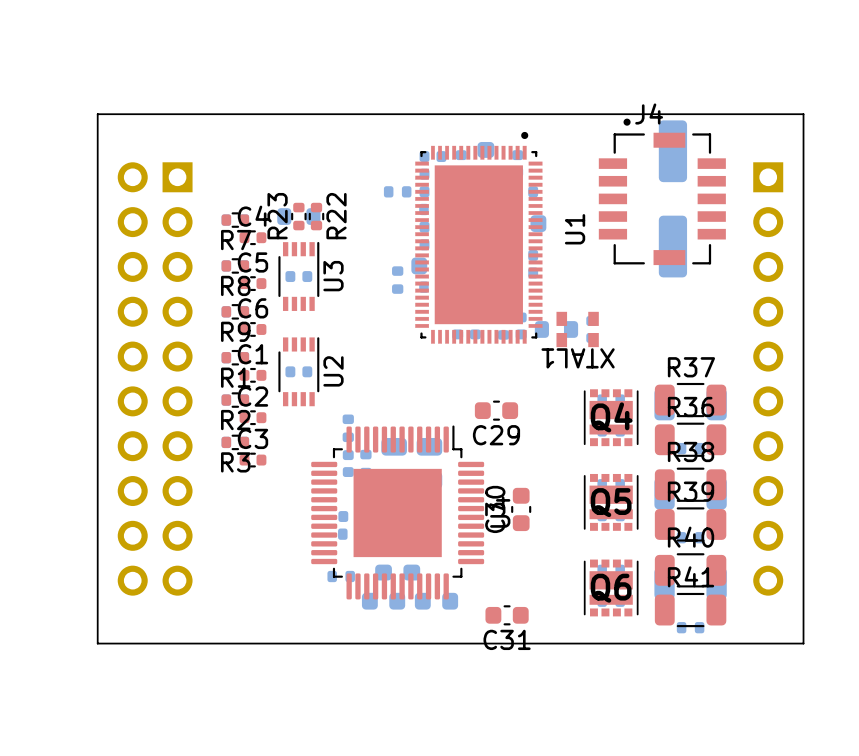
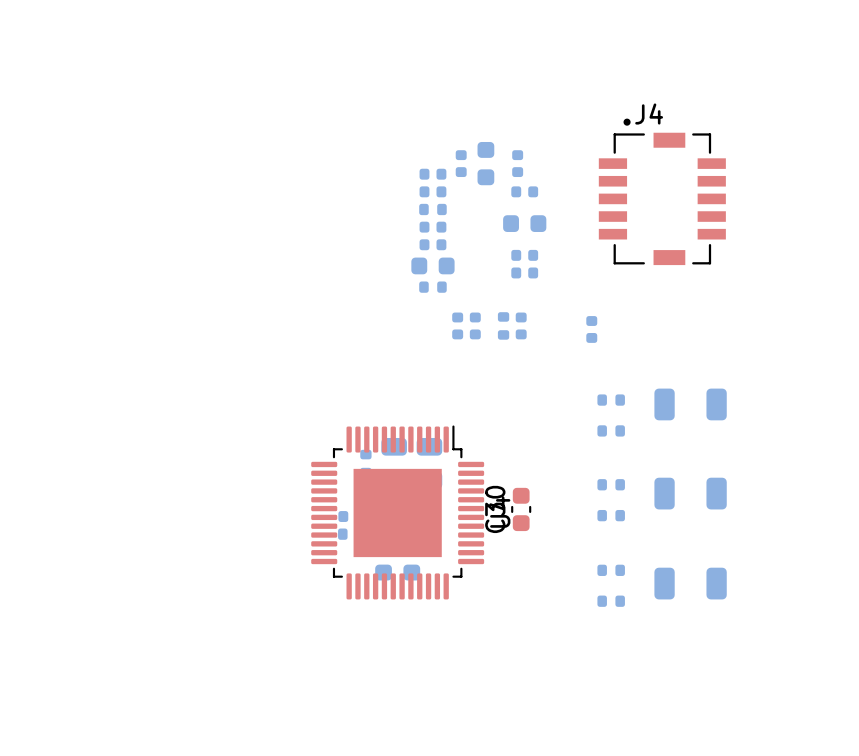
board edge: (97, 114) (803, 114) (803, 643) (97, 643) (97, 114) -> none
part: (432, 156) -> none
part: (397, 191) -> none
part: (672, 198) -> none
R23: (298, 216) -> none
part: (298, 216) -> none
R22: (316, 216) -> none
R7: (235, 220) -> none
C4: (252, 237) -> none
U1: (478, 237) -> none
R8: (235, 265) -> none
U3: (298, 276) -> none
part: (298, 276) -> none
part: (397, 280) -> none
C5: (252, 283) -> none
R9: (235, 311) -> none
C6: (252, 329) -> none
part: (556, 329) -> none
XTAL1: (577, 329) -> none
R1: (235, 357) -> none
U2: (298, 371) -> none
part: (298, 371) -> none
C1: (252, 375) -> none
part: (155, 378) -> none
part: (768, 378) -> none
R2: (235, 400) -> none
R37: (690, 400) -> none
C29: (496, 410) -> none
C2: (252, 417) -> none
Q4: (611, 417) -> none
part: (348, 428) -> none
R36: (690, 439) -> none
R3: (235, 442) -> none
part: (690, 448) -> none
C3: (252, 460) -> none
part: (348, 463) -> none
R38: (690, 484) -> none
Q5: (611, 502) -> none
R39: (690, 524) -> none
part: (690, 537) -> none
R40: (690, 570) -> none
part: (341, 576) -> none
Q6: (611, 587) -> none
part: (383, 601) -> none
part: (436, 601) -> none
R41: (690, 610) -> none
C31: (507, 615) -> none
part: (690, 627) -> none

